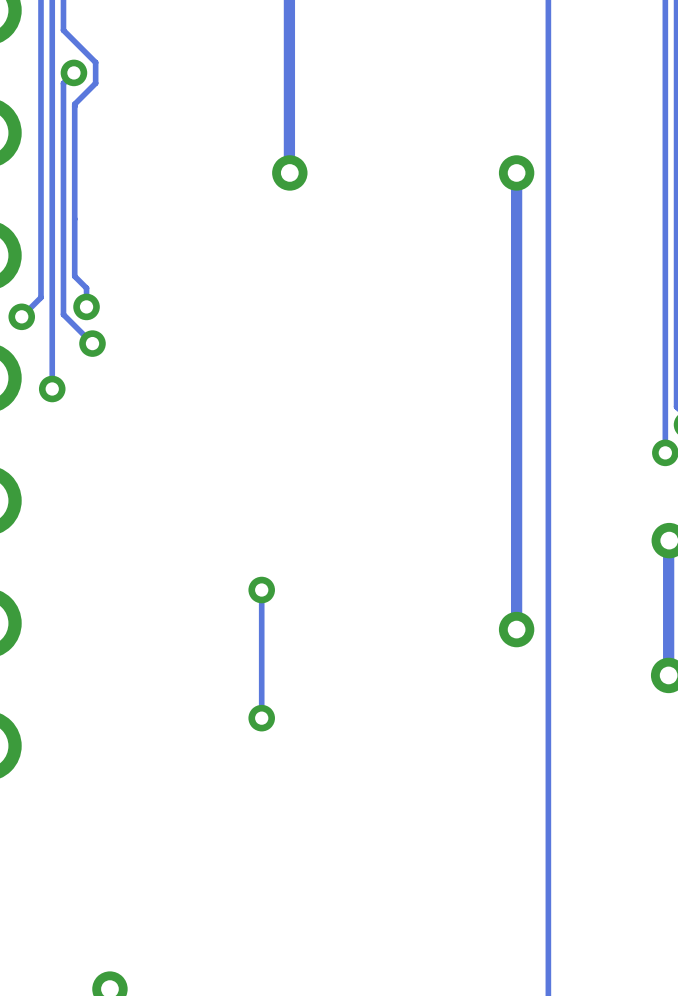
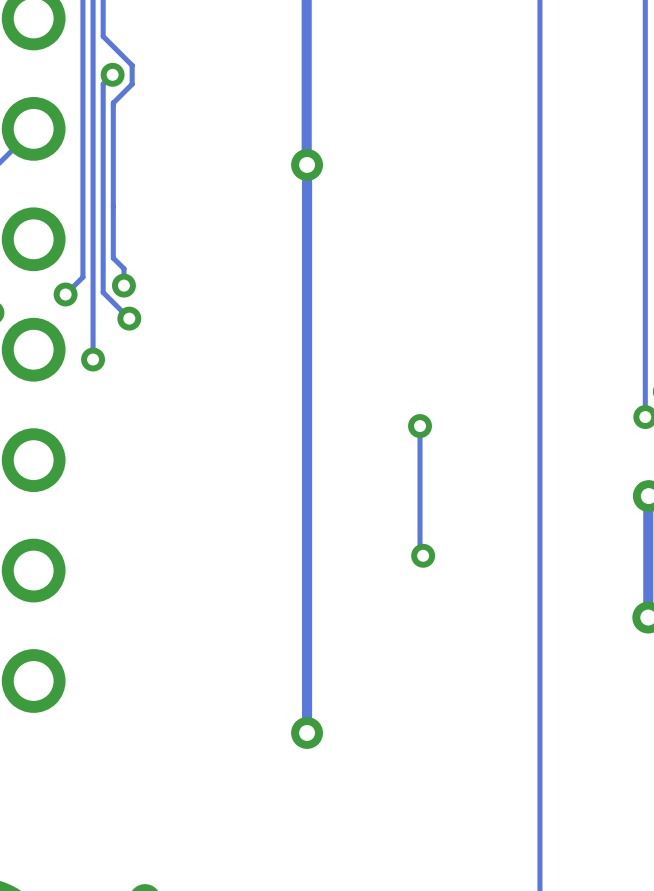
track: none -> (307, 164) (307, 732)
track: (516, 172) (516, 629) -> none
via: (516, 172) -> none
track: none -> (420, 426) (420, 552) (423, 555)
via: none -> (420, 426)
track: (261, 590) (261, 718) -> none
via: (261, 590) -> none
via: none -> (423, 555)
via: (516, 629) -> none
via: (261, 718) -> none
via: none -> (307, 732)

